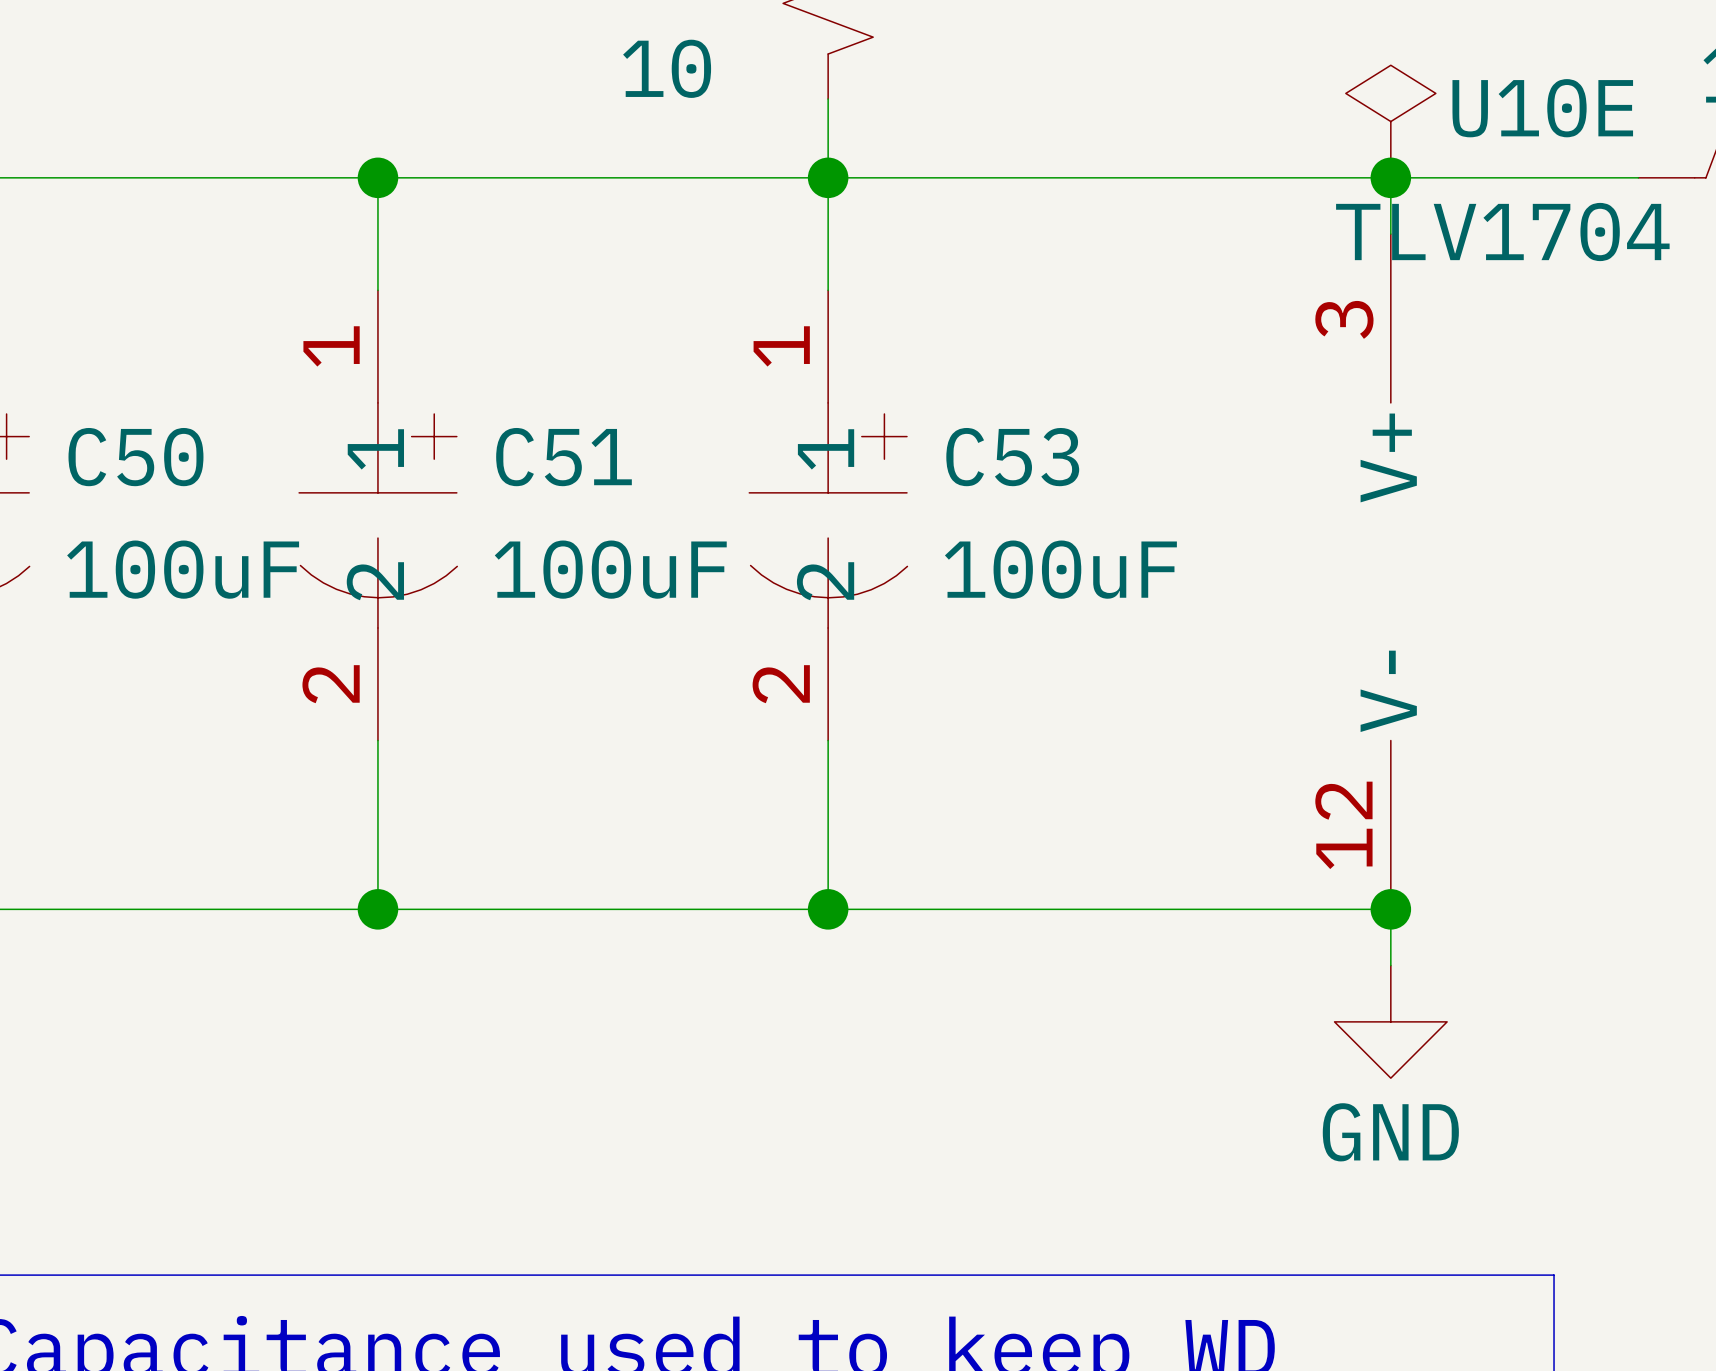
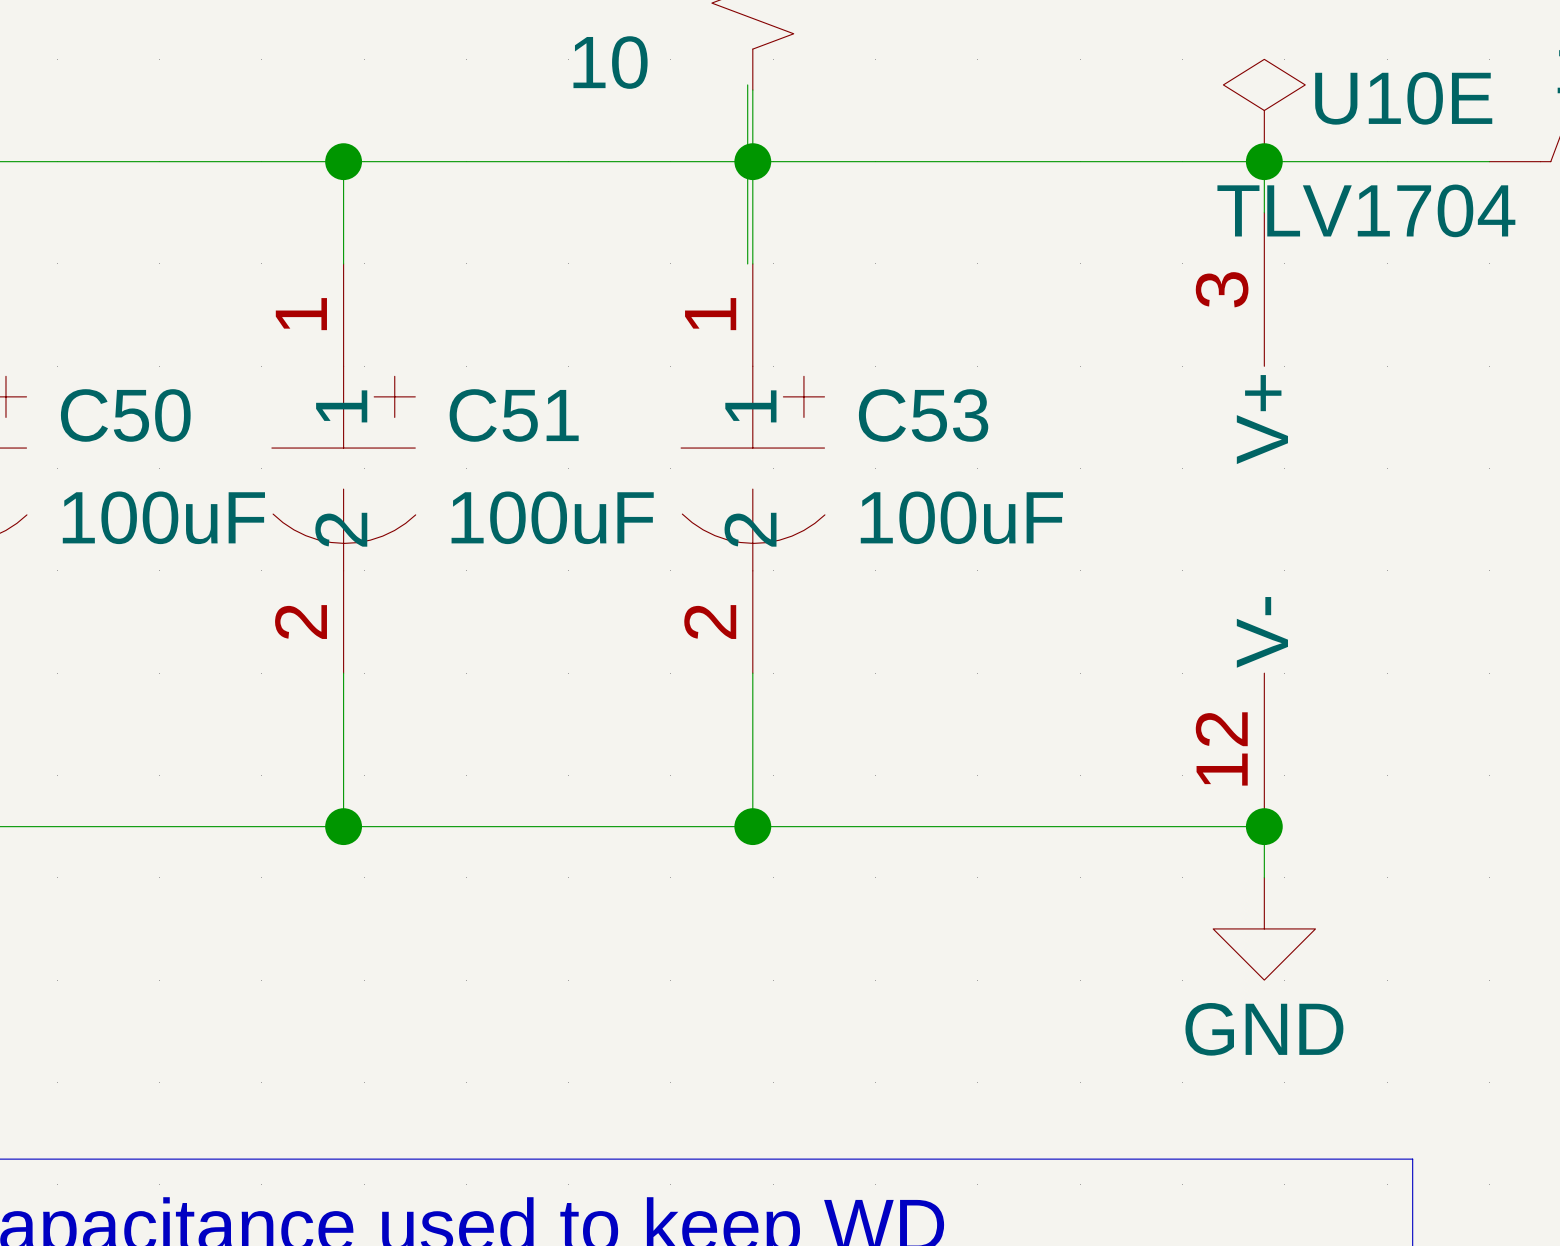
wire: none -> (747, 84) (747, 263)

